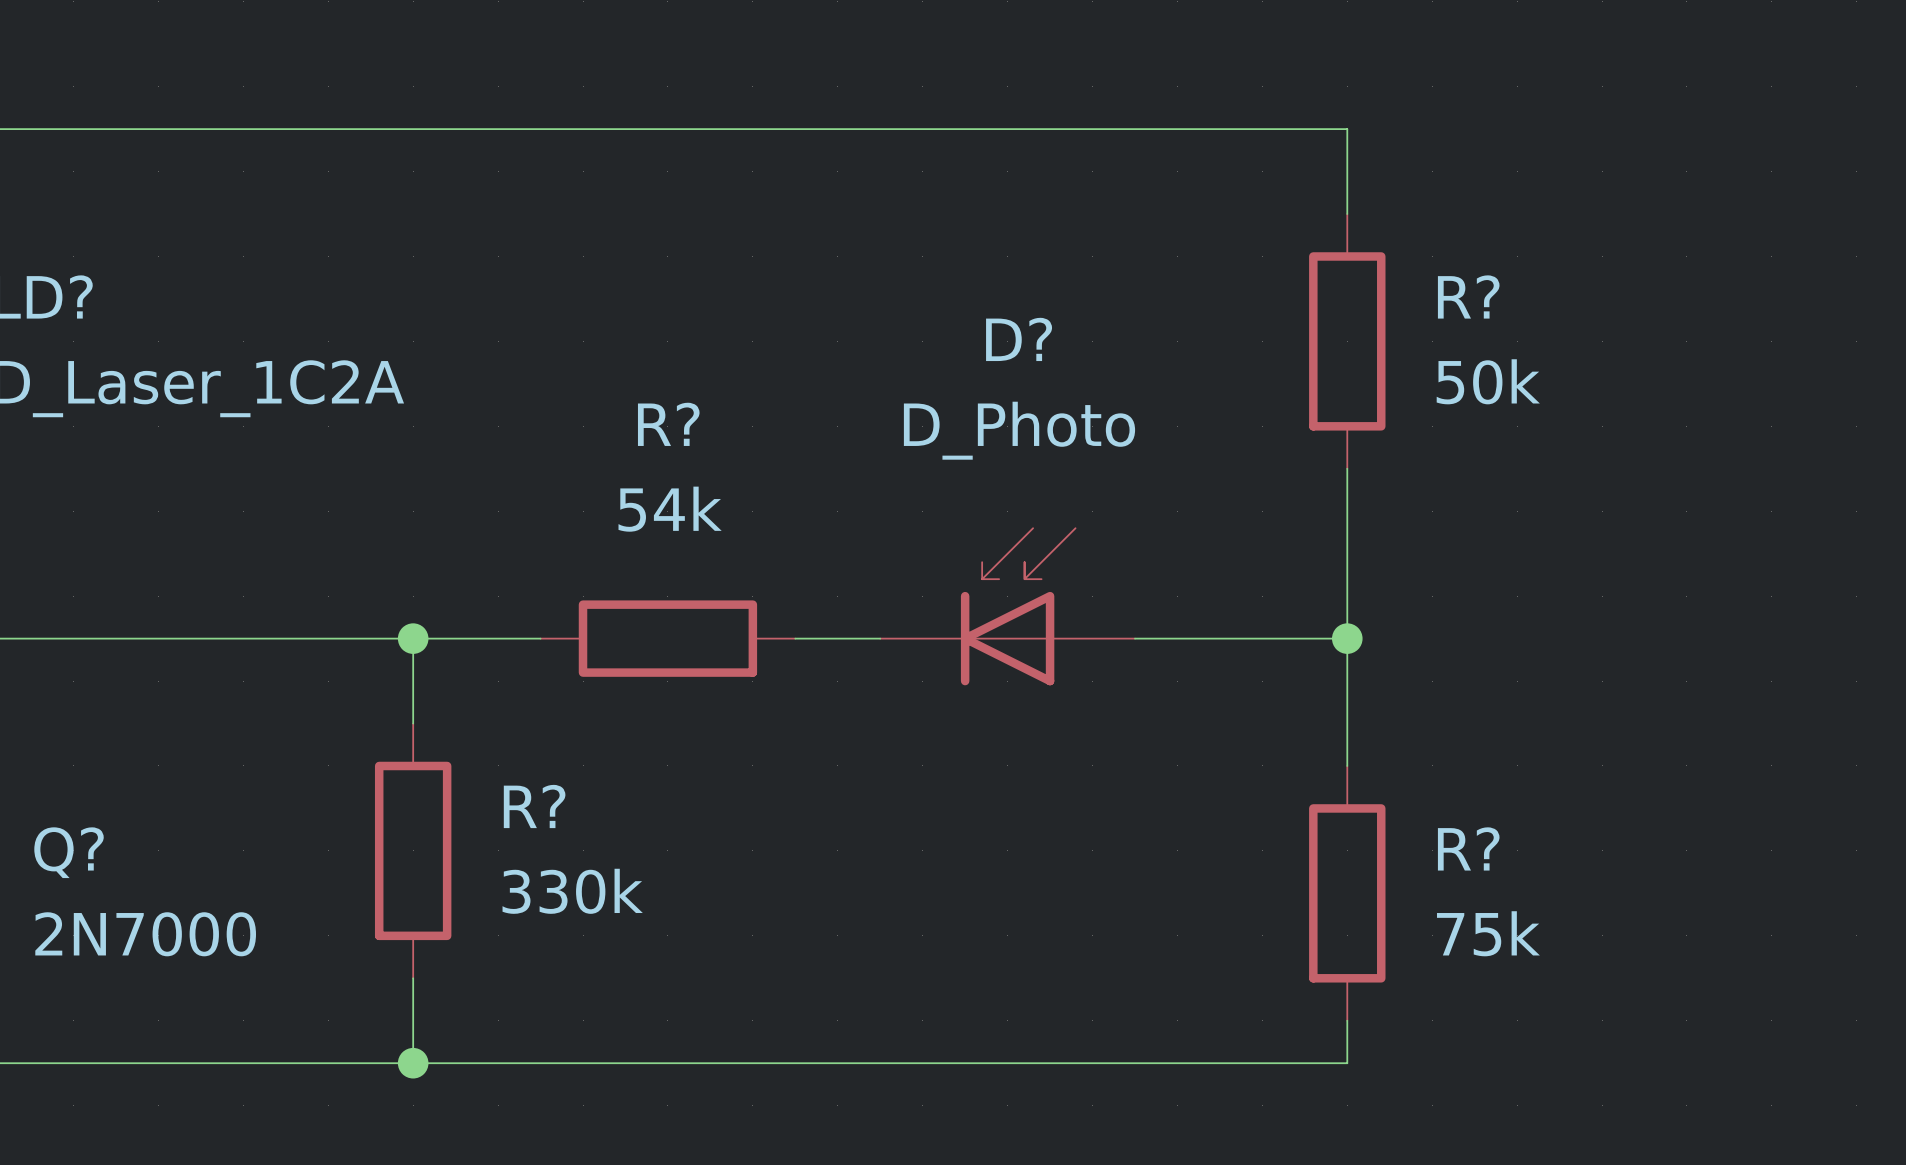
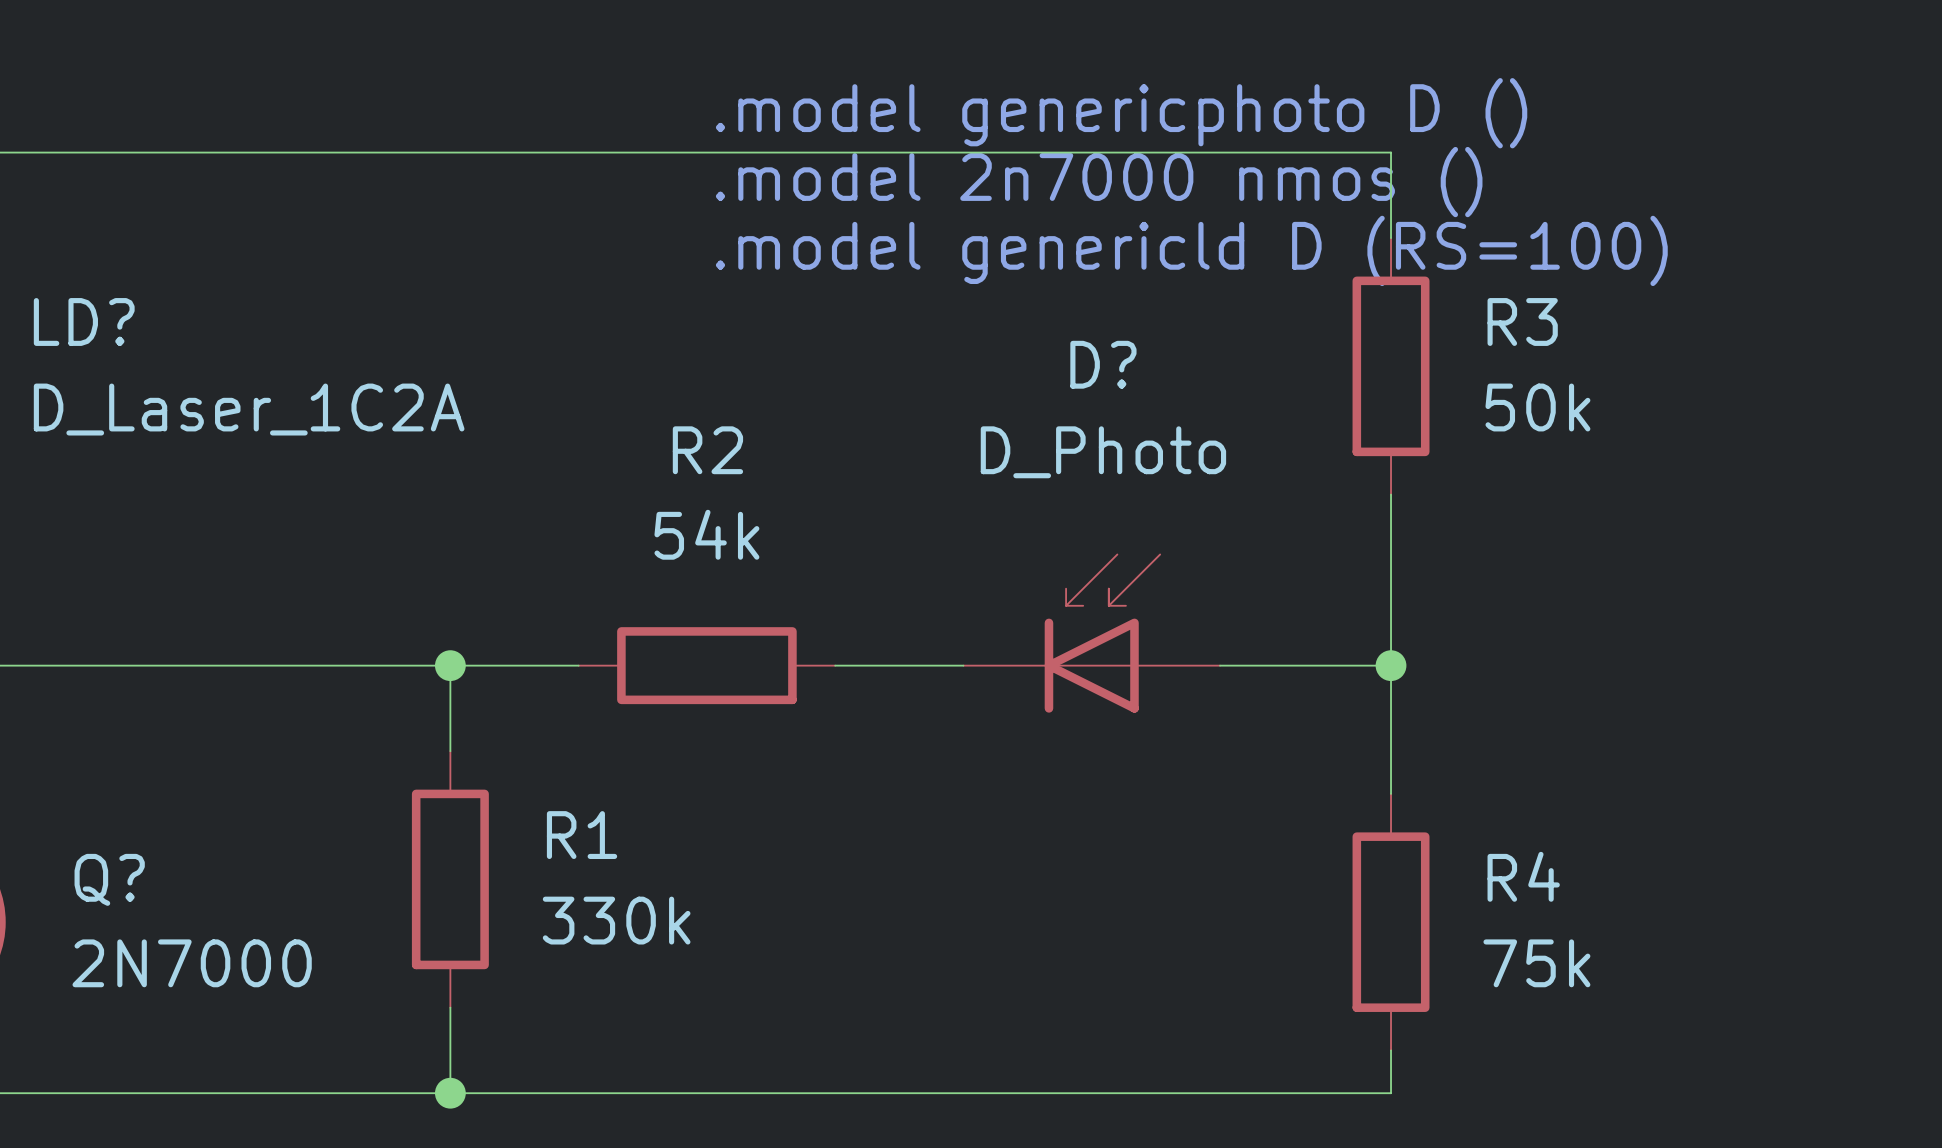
text: none -> .model genericphoto D () (1121, 113)
text: none -> .model 2n7000 nmos () (1099, 182)
text: none -> .model genericld D (RS=100) (1191, 250)
R? name: R? (1468, 296) -> R3 (1522, 321)
R? name: R? (668, 424) -> R2 (707, 450)
D? position: (1007, 606) -> (1091, 633)
R? name: R? (534, 806) -> R1 (582, 835)
R? name: R? (1468, 848) -> R4 (1523, 876)

